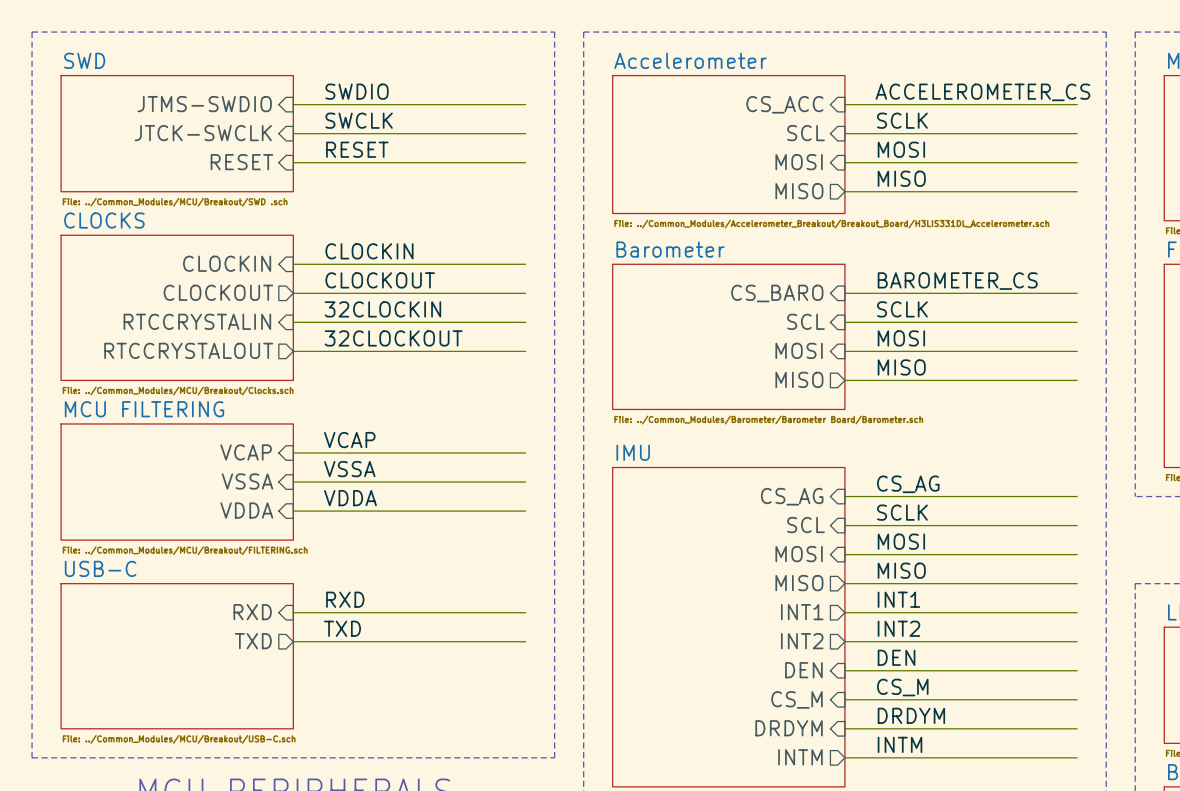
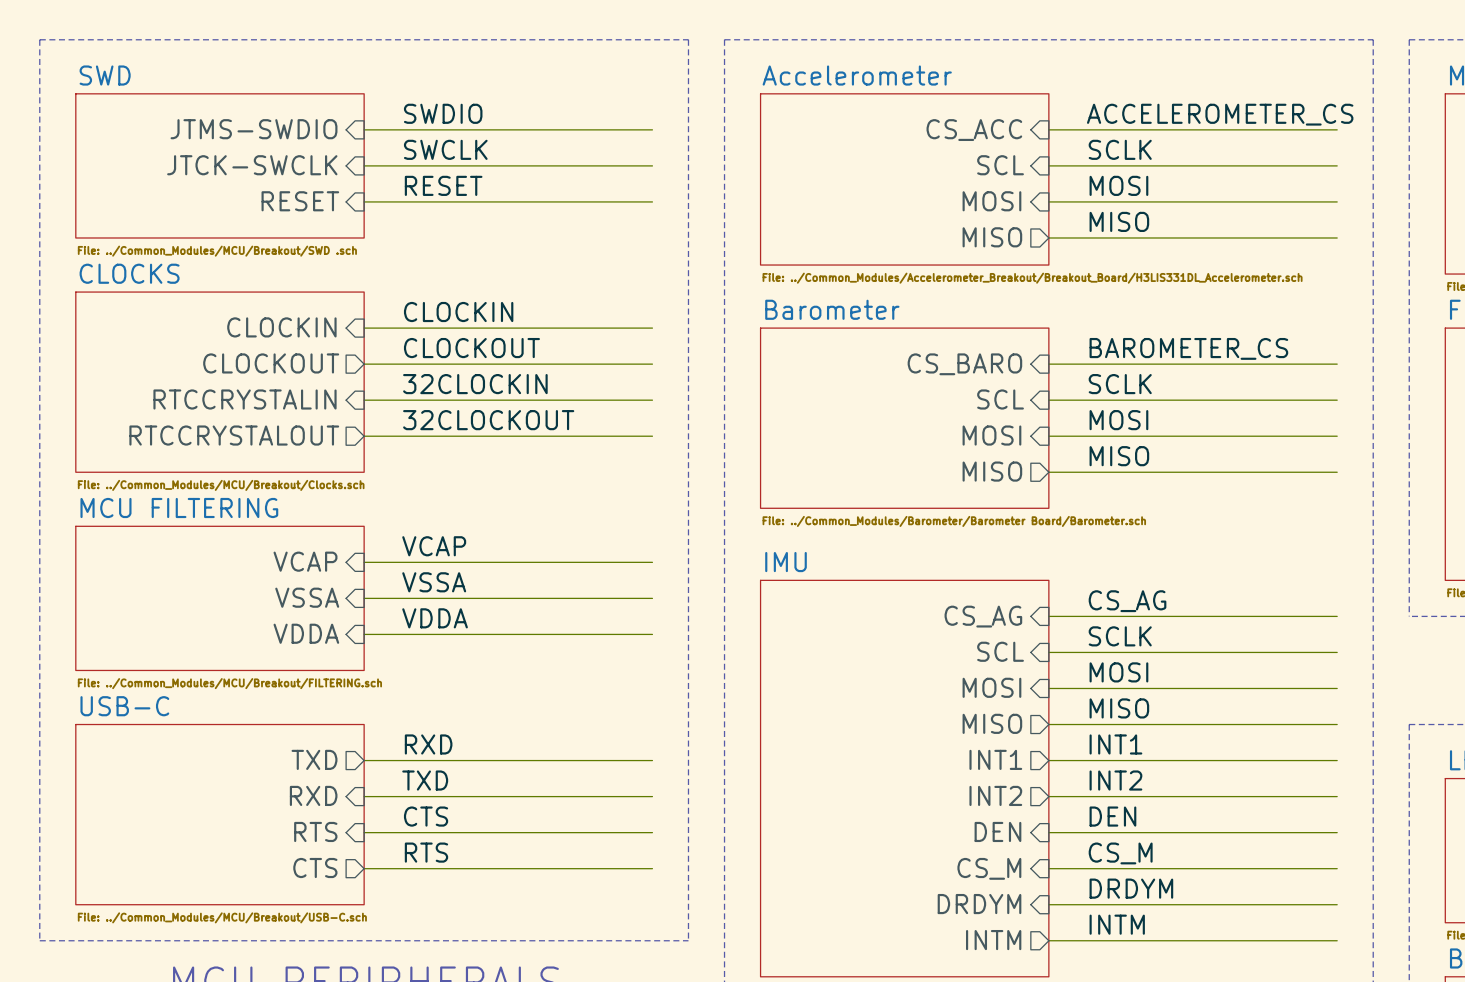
sheet pin shape: input (252, 612) -> output (314, 759)
sheet pin: RXD (252, 612) -> TXD (314, 759)
sheet pin shape: output (253, 641) -> input (313, 795)
sheet pin: TXD (253, 641) -> RXD (313, 795)
label: none -> CTS (426, 816)
sheet pin: none -> RTS (315, 831)
wire: none -> (364, 832) (652, 832)
label: none -> RTS (426, 852)
sheet pin: none -> CTS (315, 868)
wire: none -> (364, 868) (652, 868)

